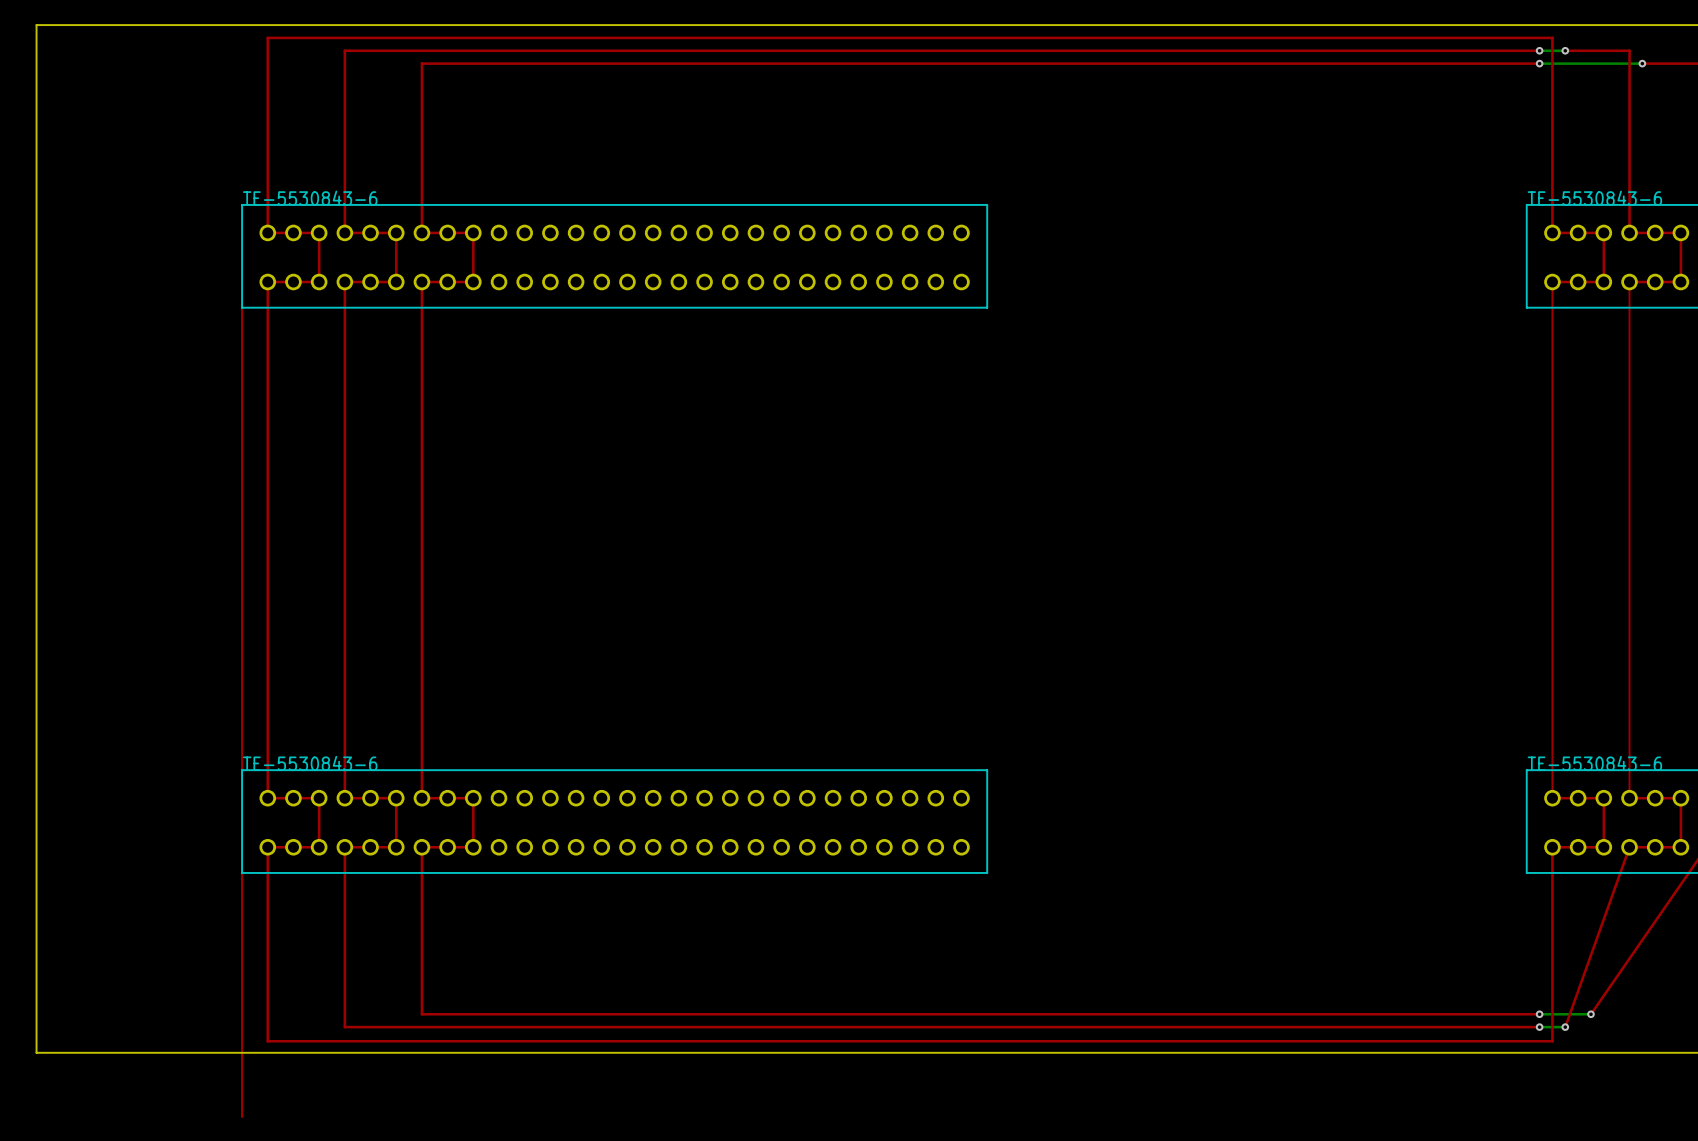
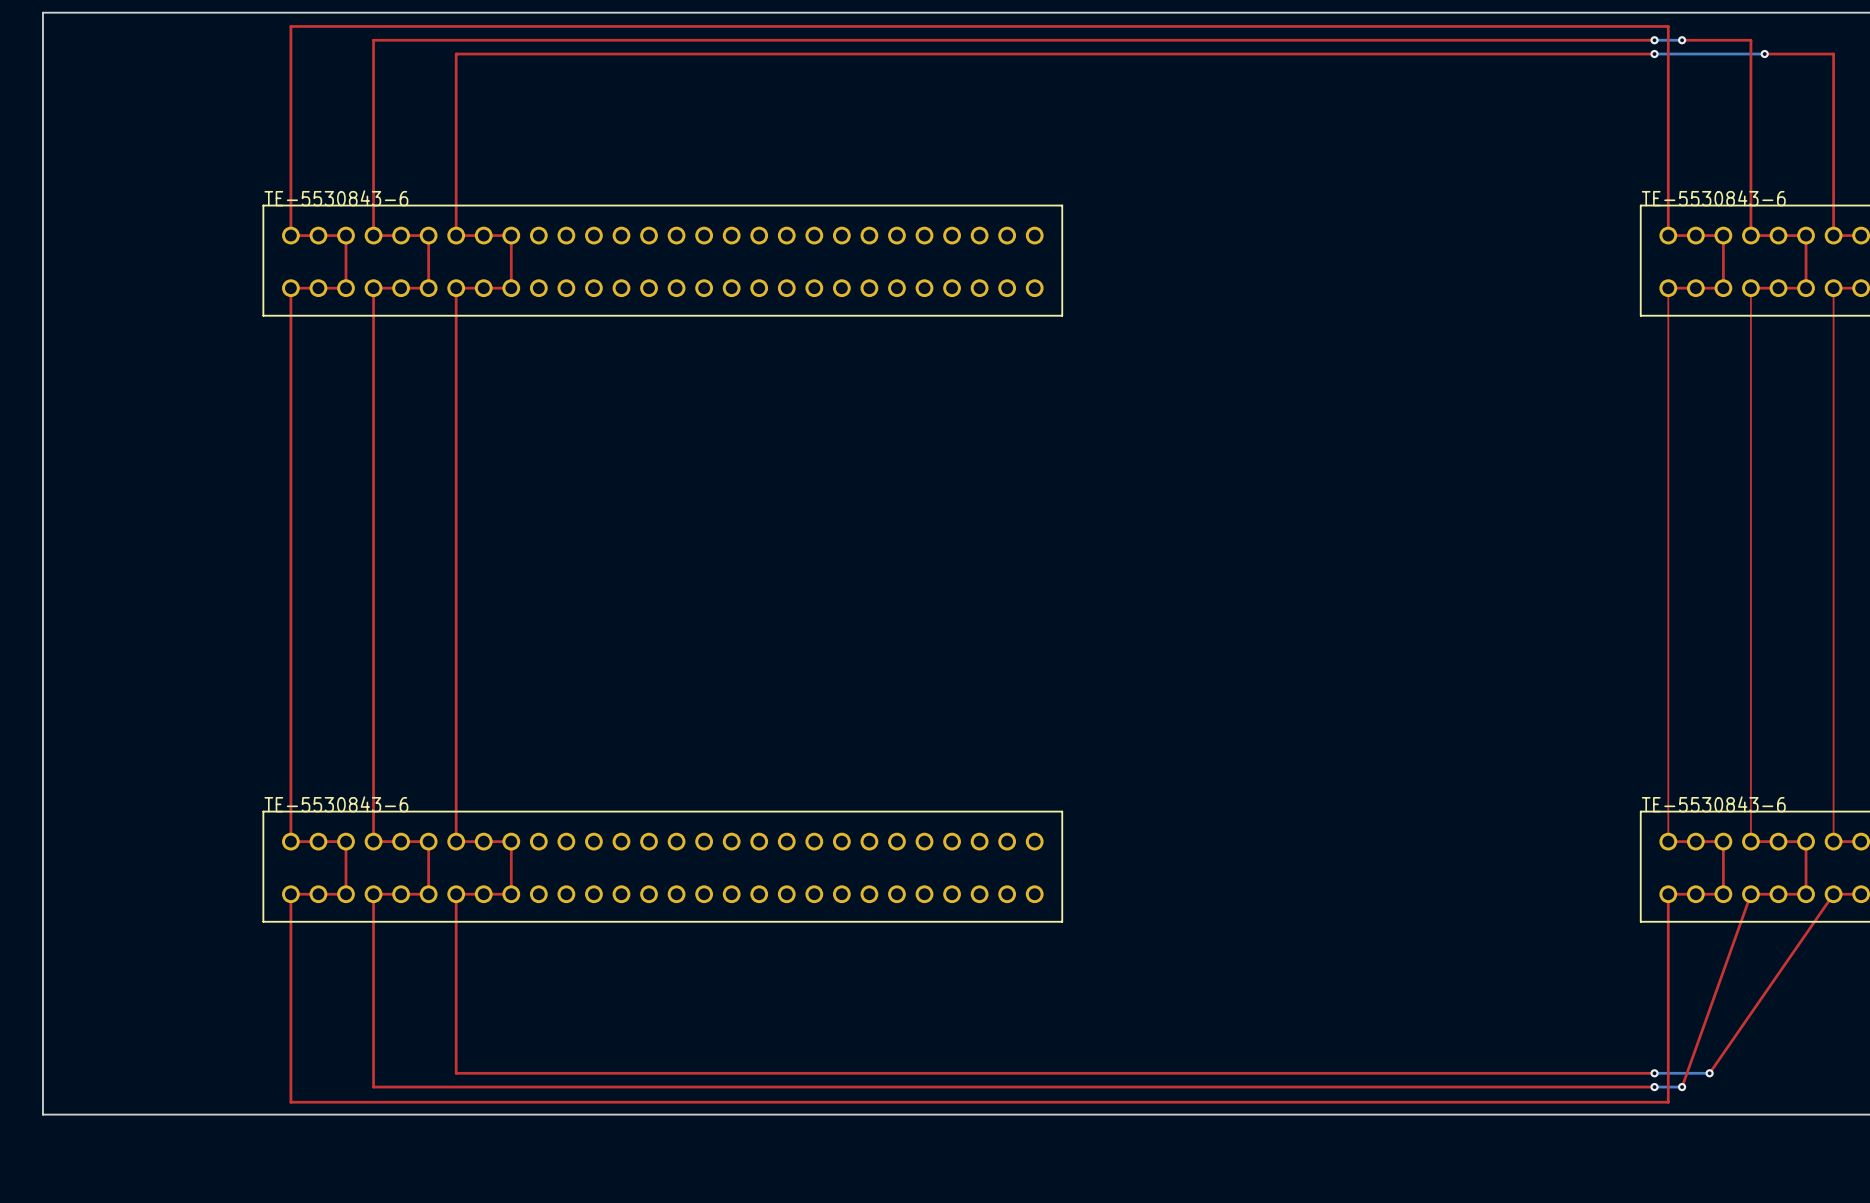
top track: (242, 307) (242, 1117) -> none

